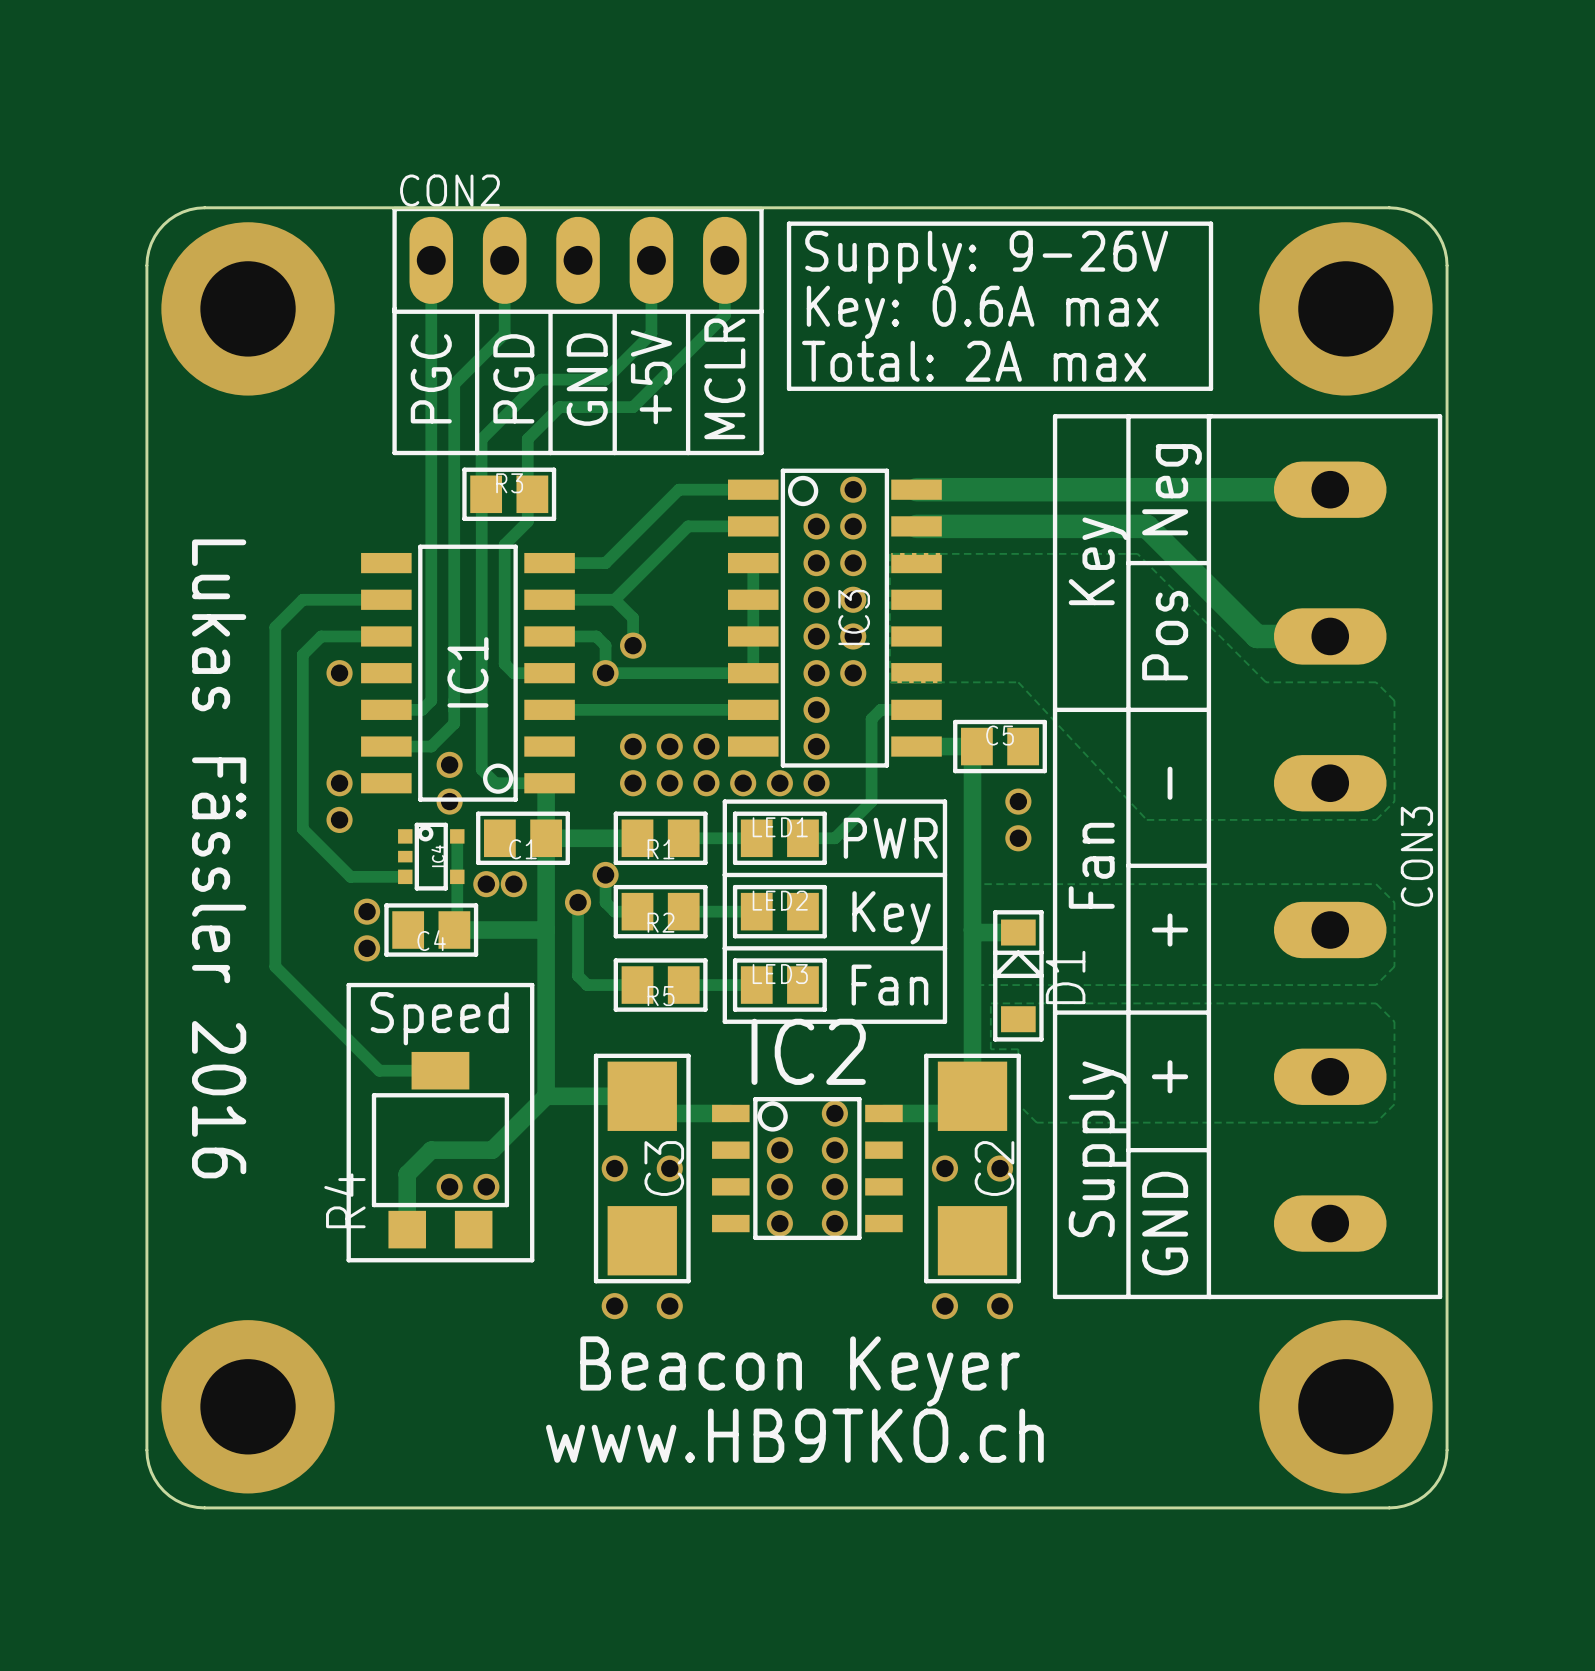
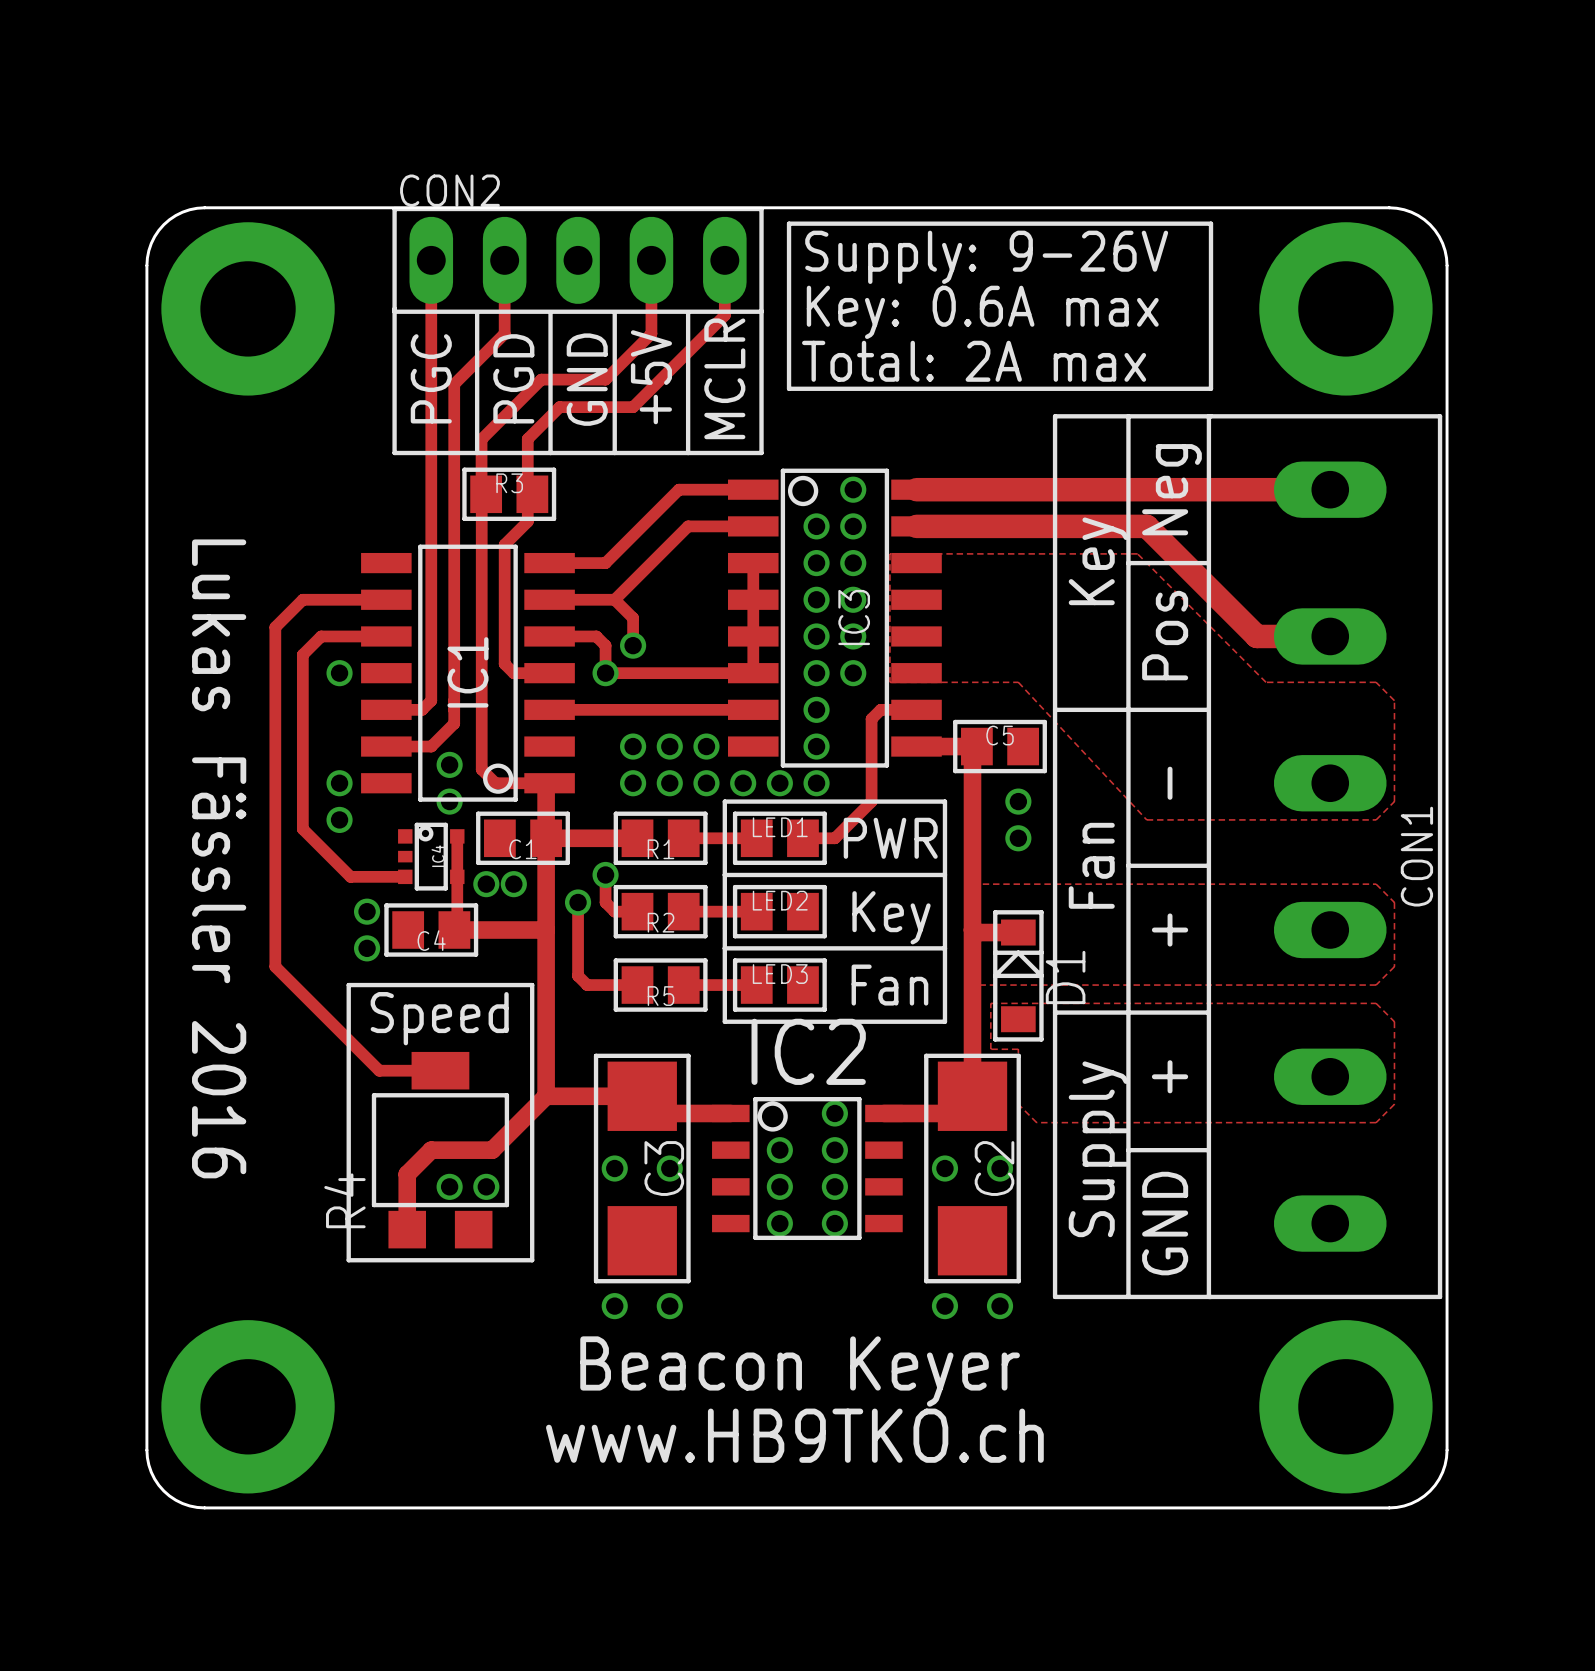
CON3 name: CON3 (1416, 856) -> CON1 (1416, 856)

